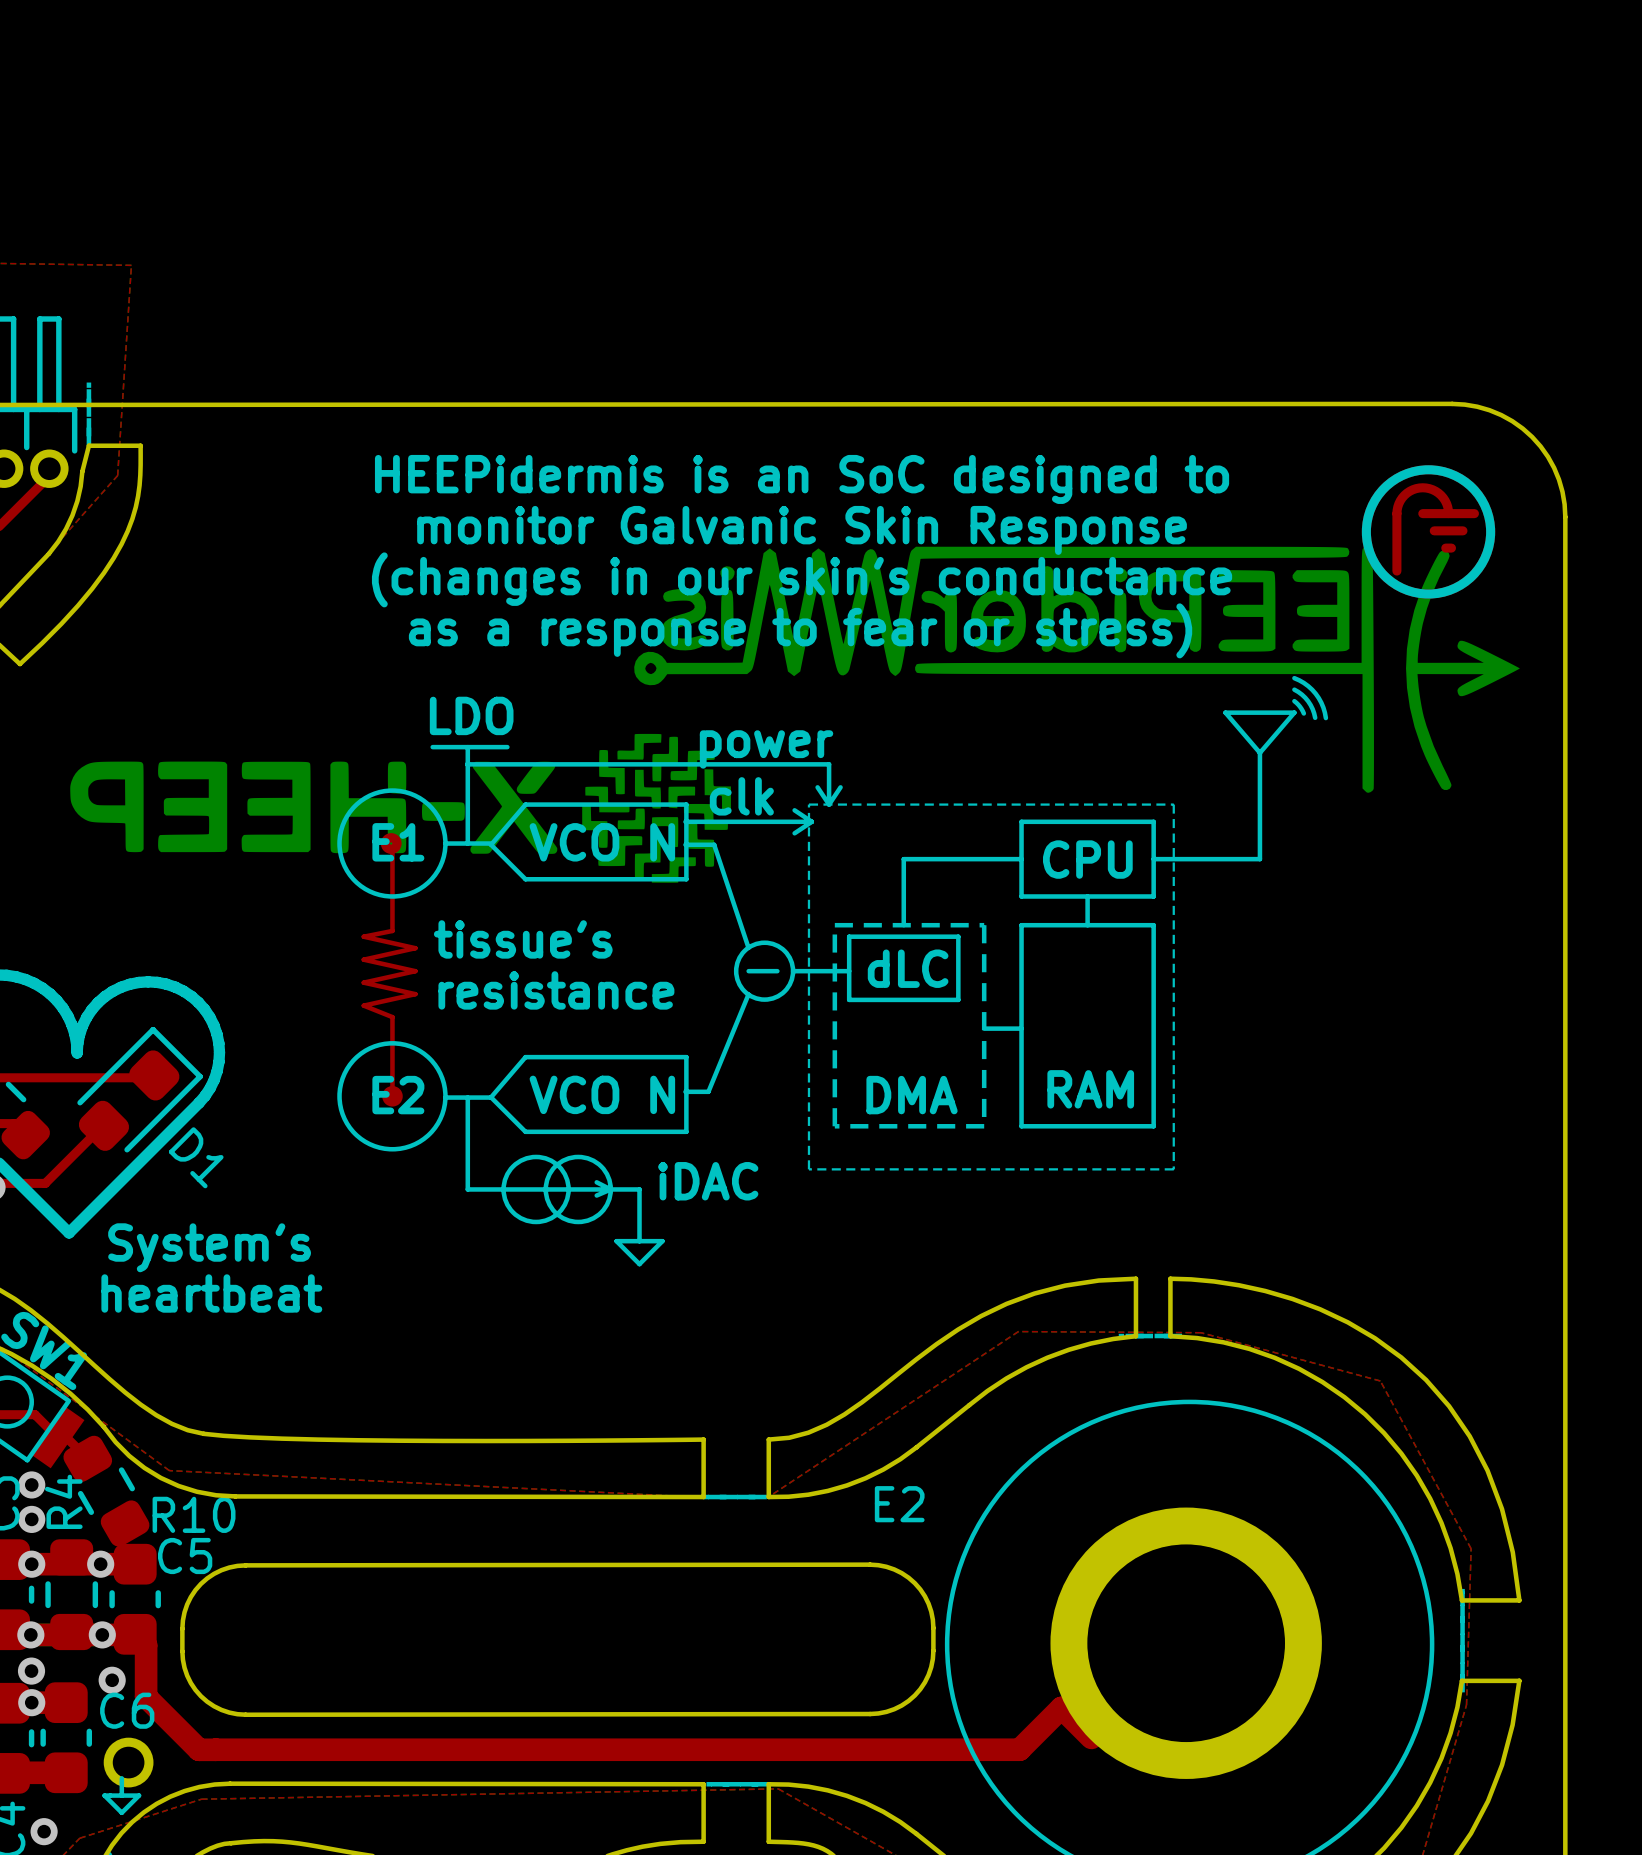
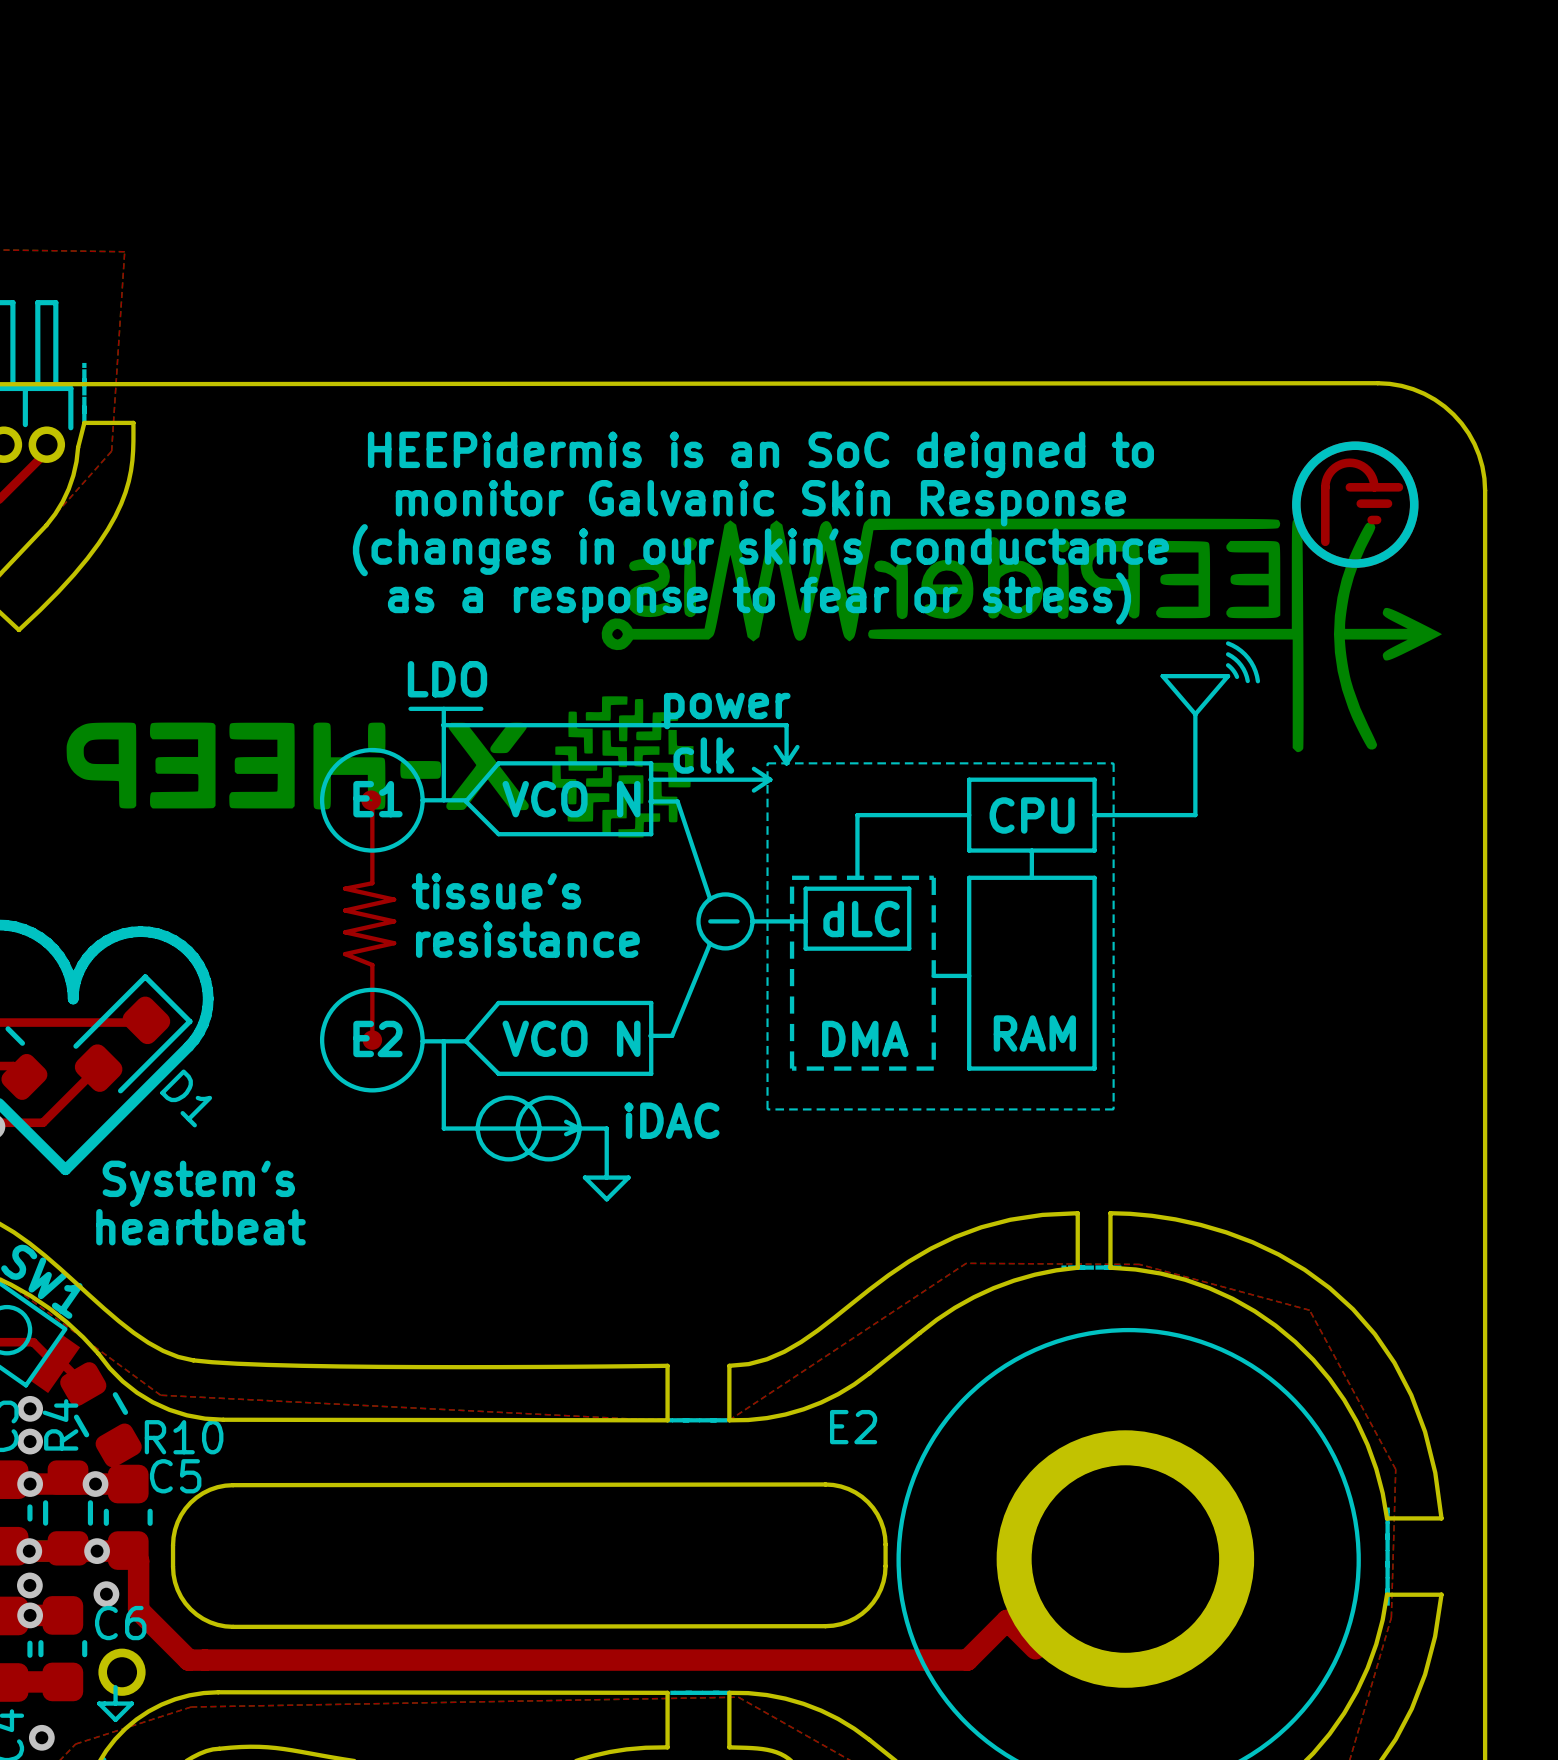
text: HEEPidermis is an SoC designed to (802, 479) -> HEEPidermis is an SoC deigned to (760, 454)

